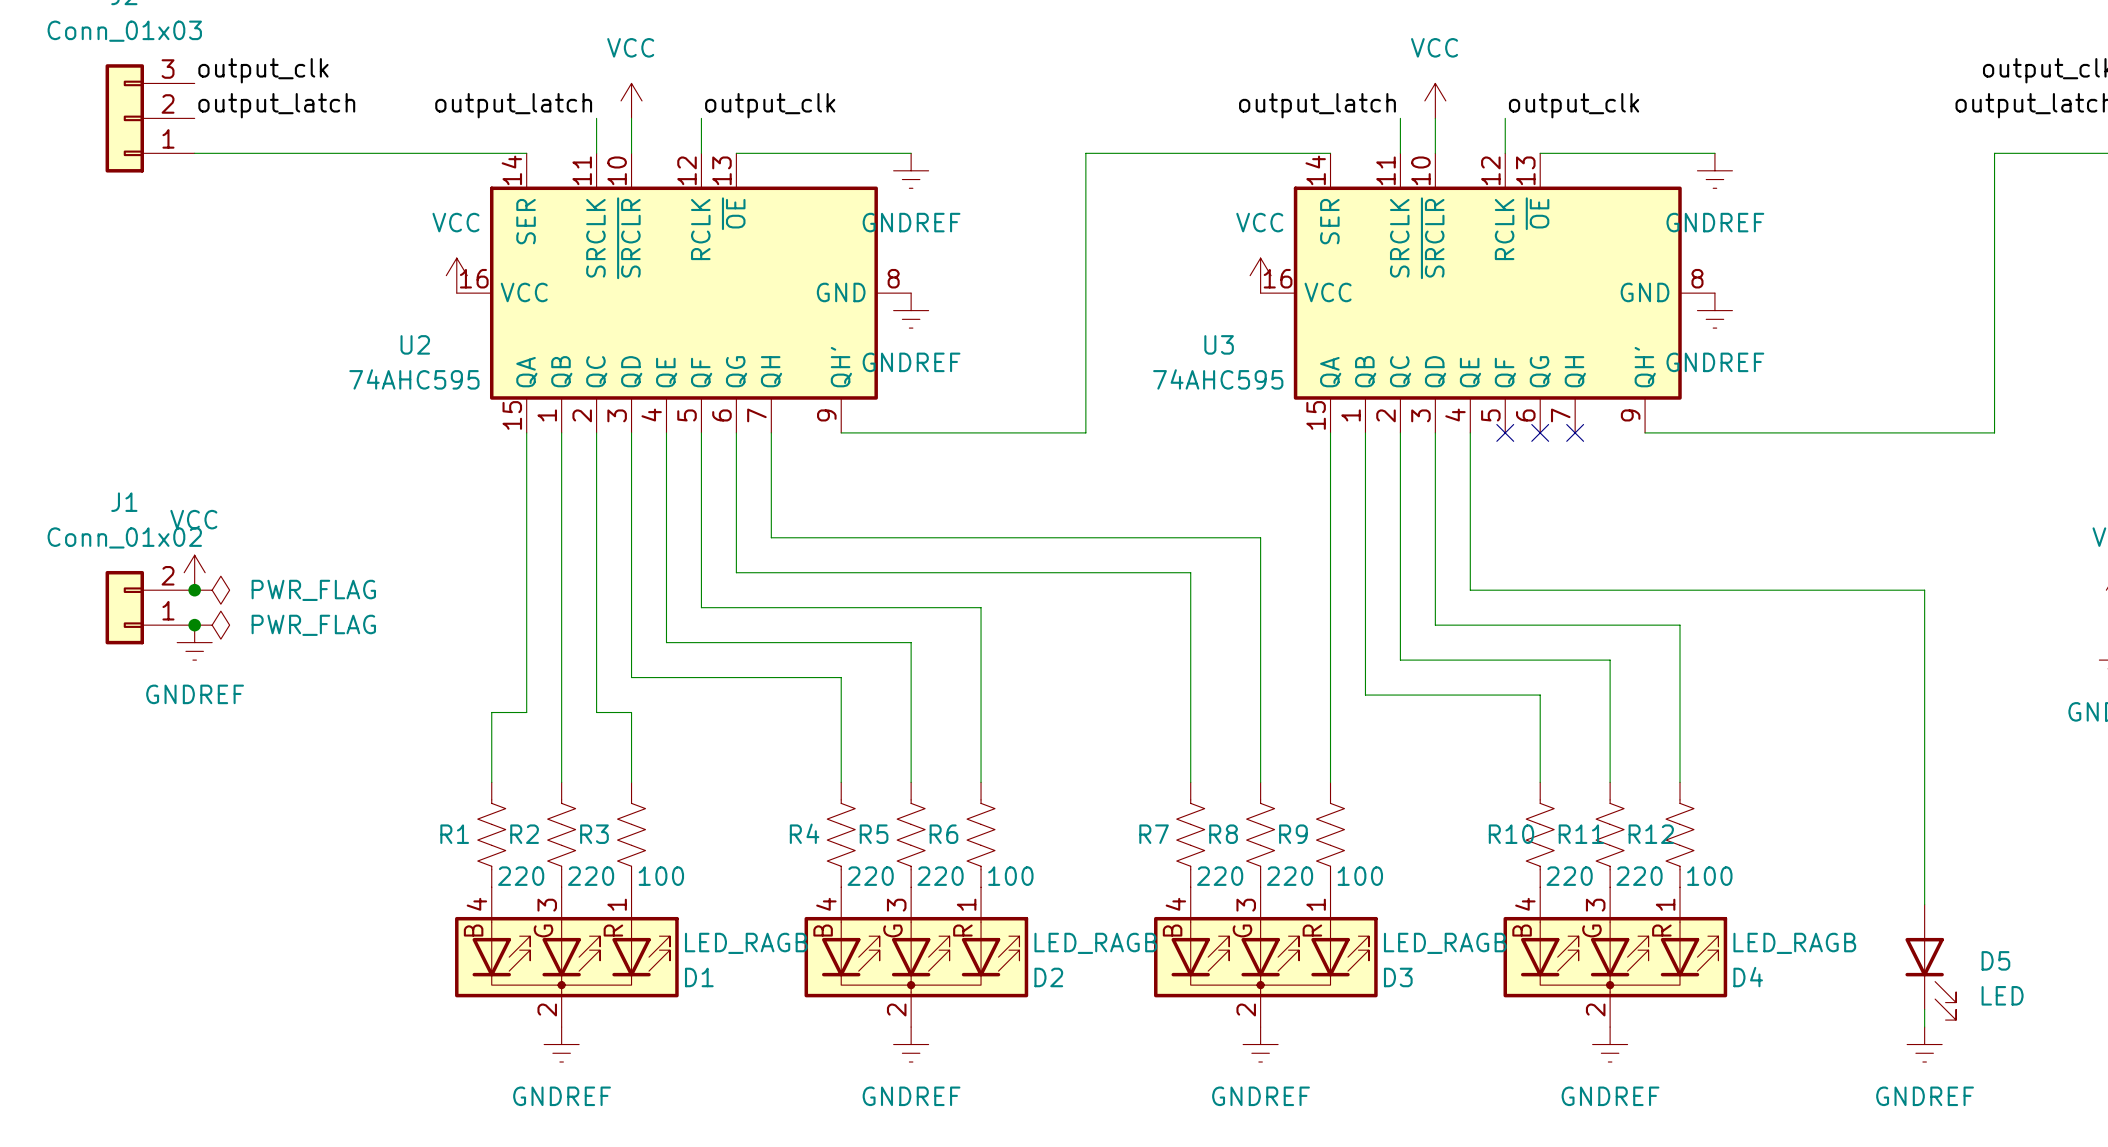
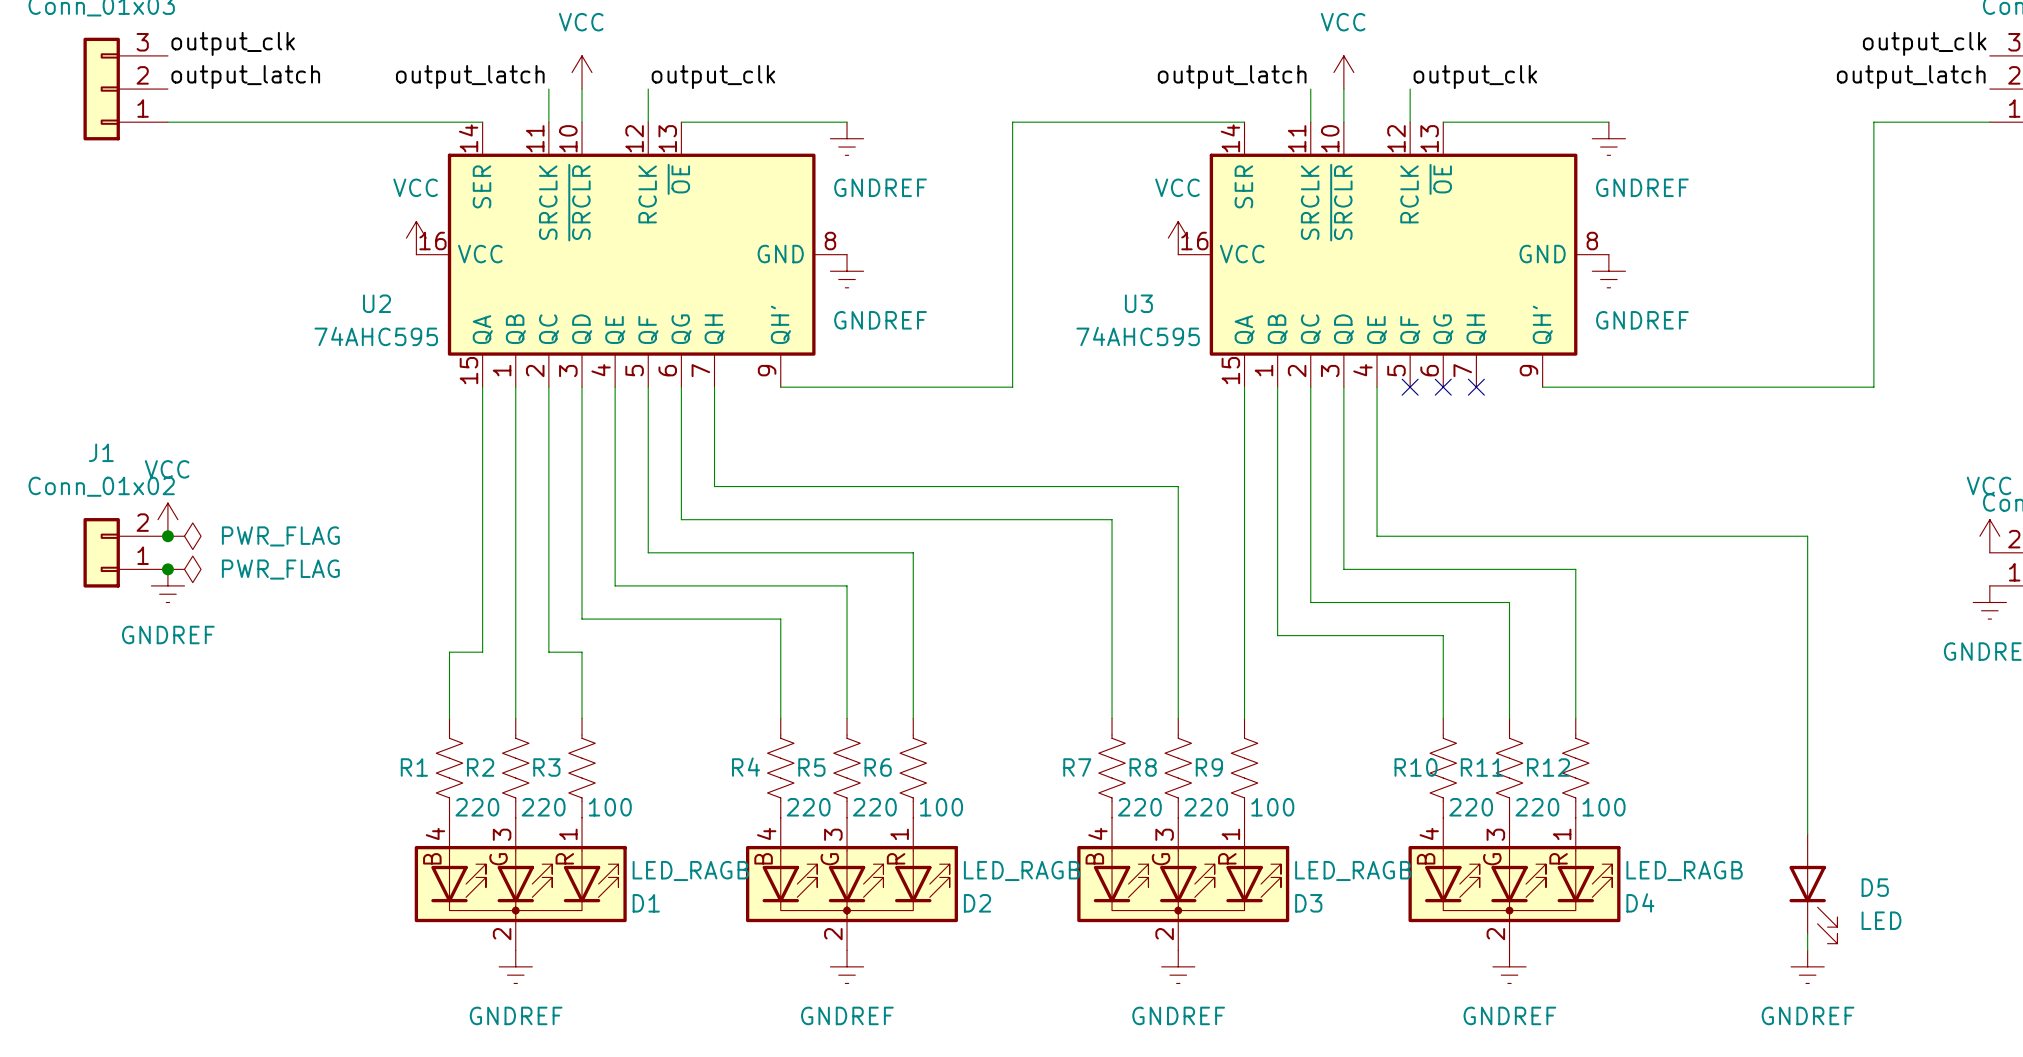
power symbol text position: GNDREF (911, 222) -> GNDREF (880, 187)
power symbol text position: GNDREF (1715, 222) -> GNDREF (1642, 187)
power symbol text position: GNDREF (911, 362) -> GNDREF (880, 320)
power symbol text position: GNDREF (1715, 362) -> GNDREF (1642, 320)

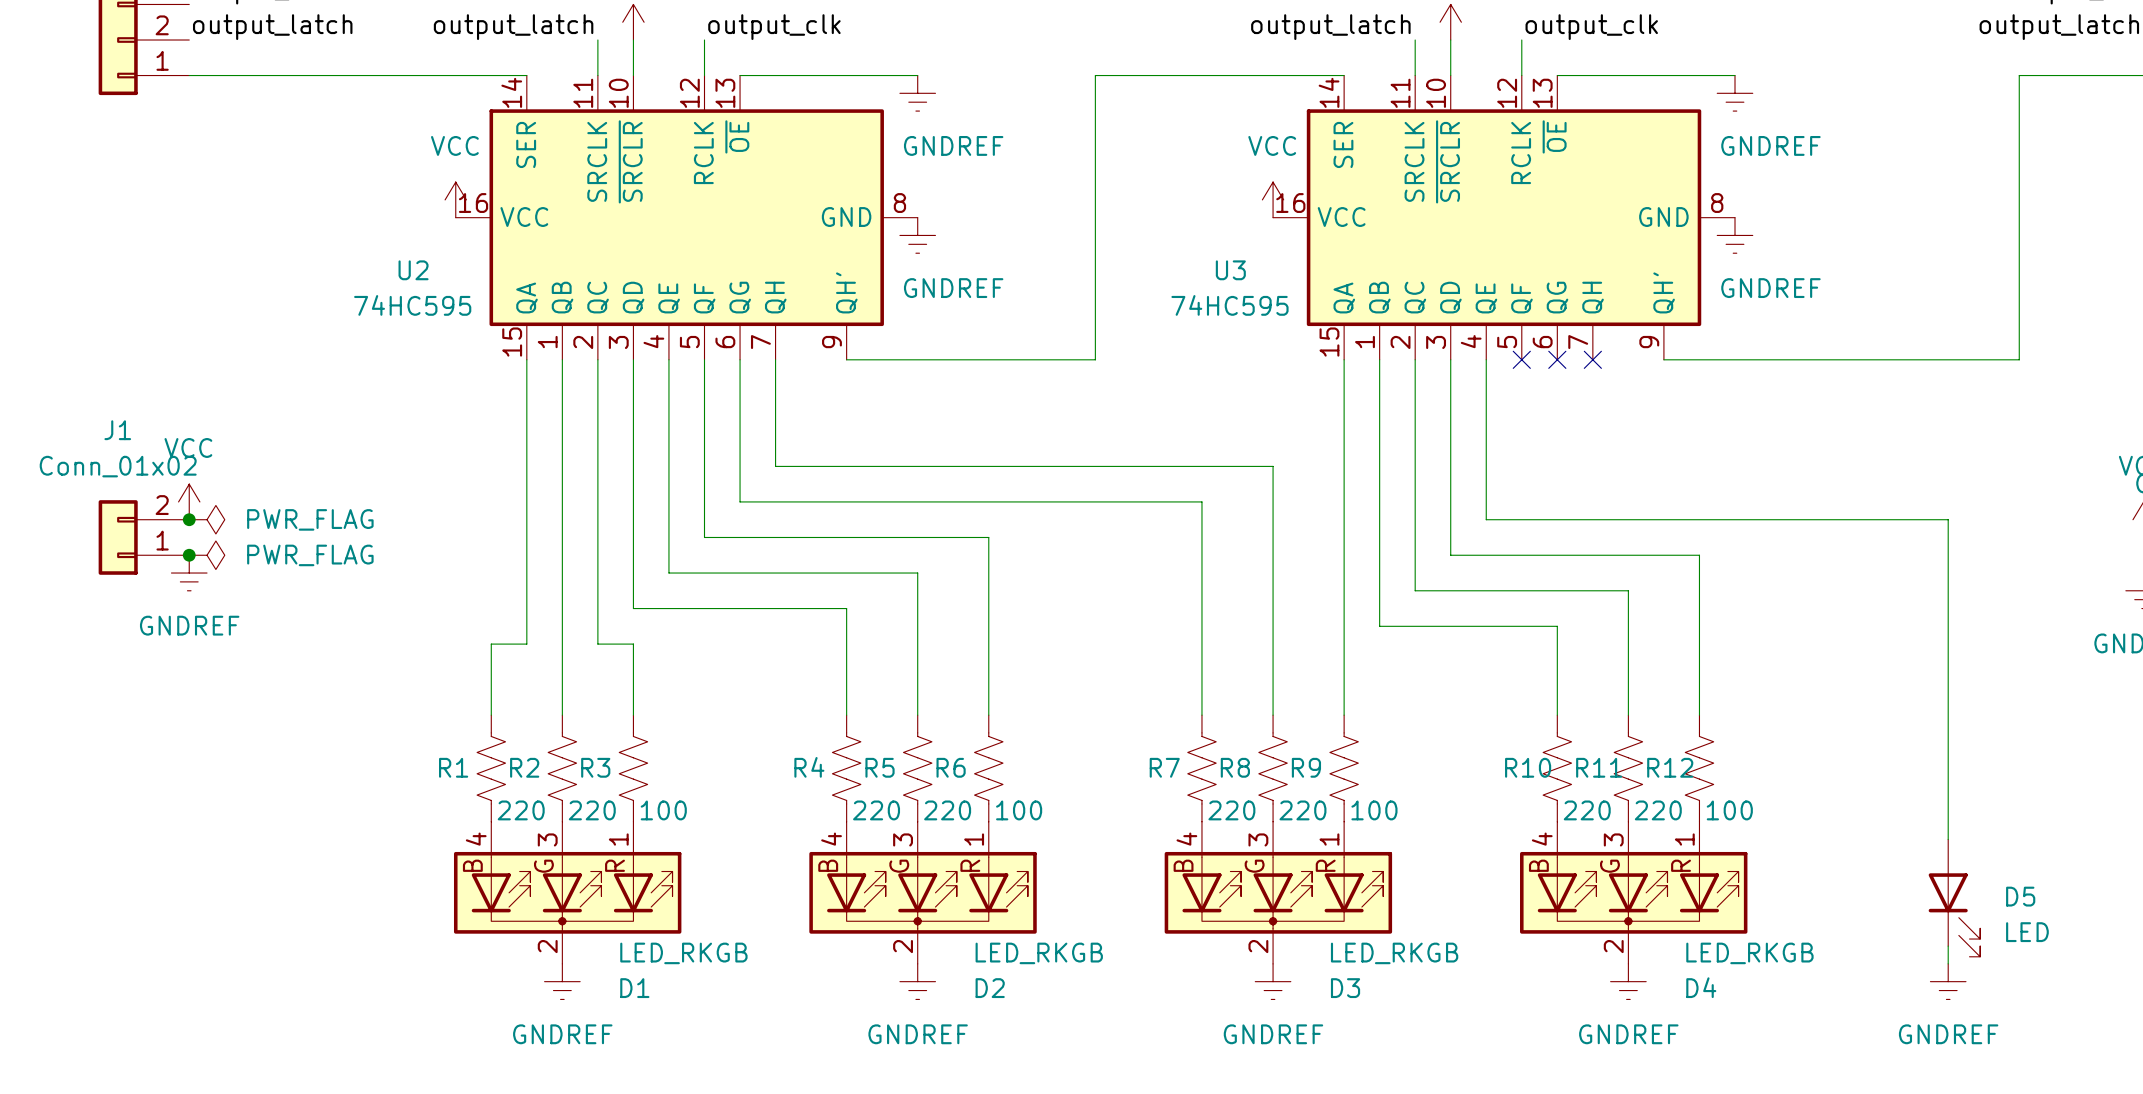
U2 value: 74AHC595 (376, 336) -> 74HC595 (412, 305)
U3 value: 74AHC595 (1138, 336) -> 74HC595 (1229, 305)
D1 value: LED_RAGB (690, 870) -> LED_RKGB (683, 953)
D2 value: LED_RAGB (1022, 870) -> LED_RKGB (1039, 953)
D3 value: LED_RAGB (1353, 870) -> LED_RKGB (1394, 953)
D4 value: LED_RAGB (1684, 870) -> LED_RKGB (1749, 953)
D4 name position: D4 (1640, 902) -> D4 (1701, 987)
D1 name position: D1 (646, 903) -> D1 (634, 988)
D2 name position: D2 (977, 903) -> D2 (990, 988)
D3 name position: D3 (1308, 903) -> D3 (1345, 988)

